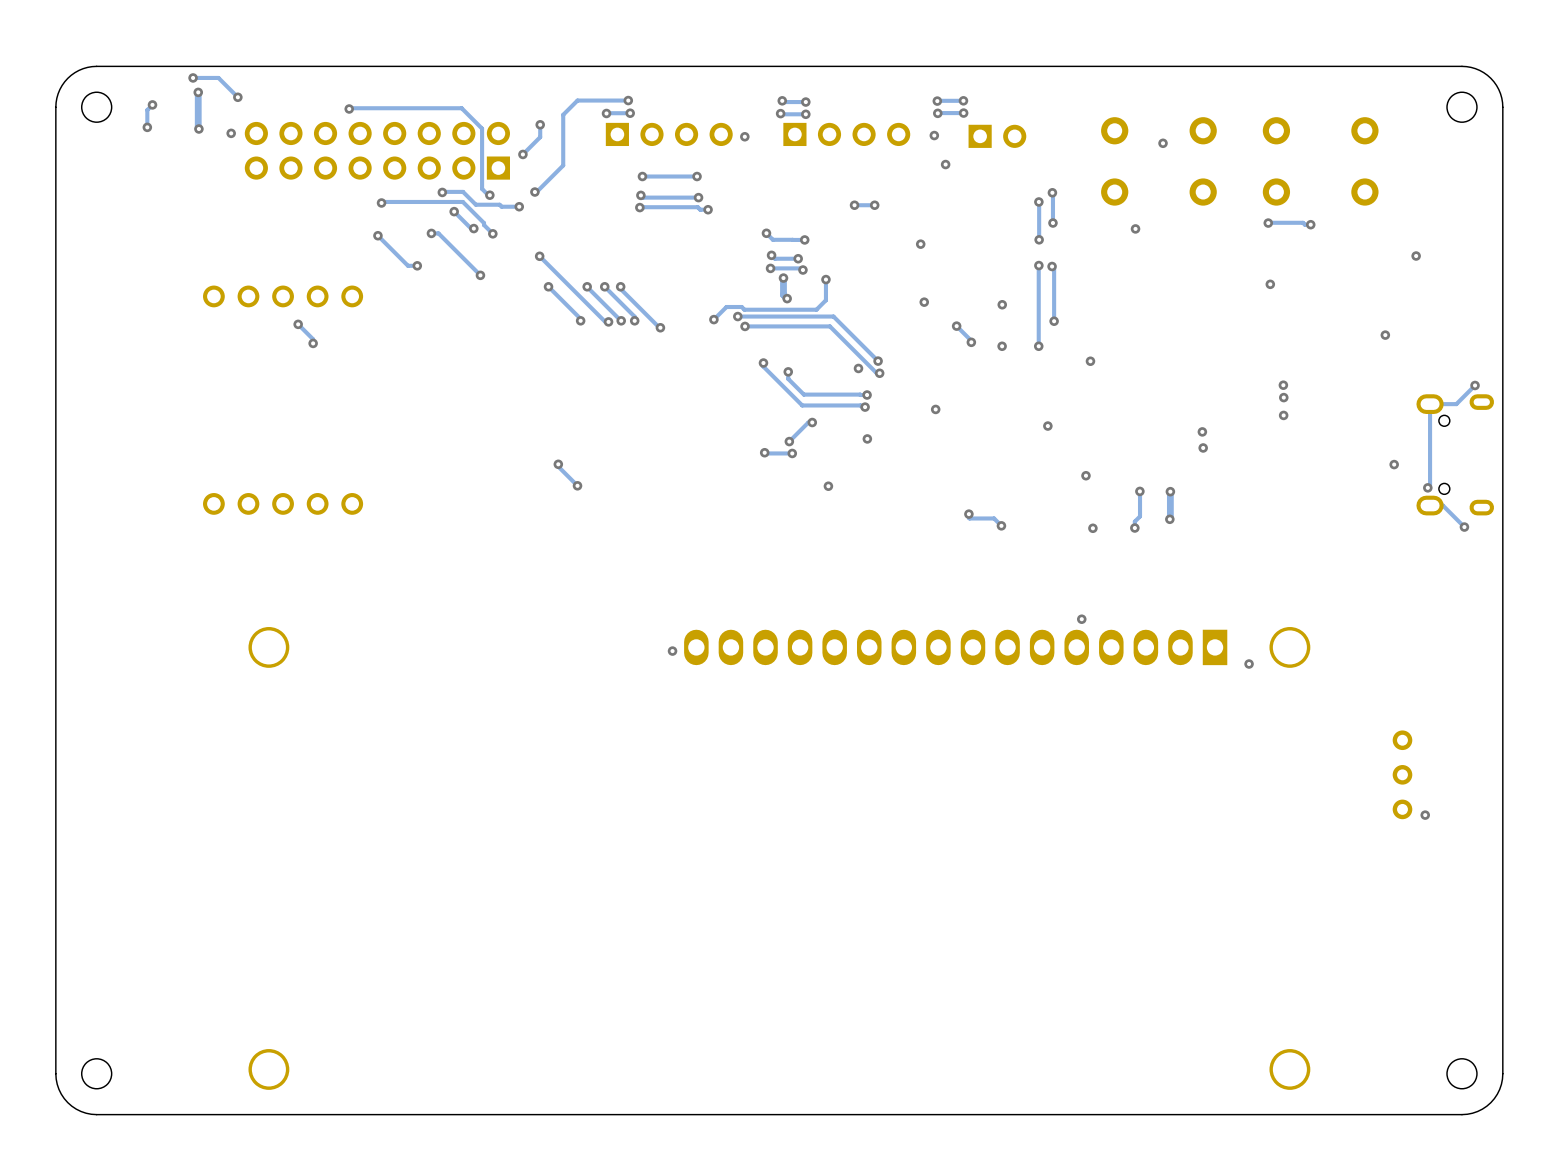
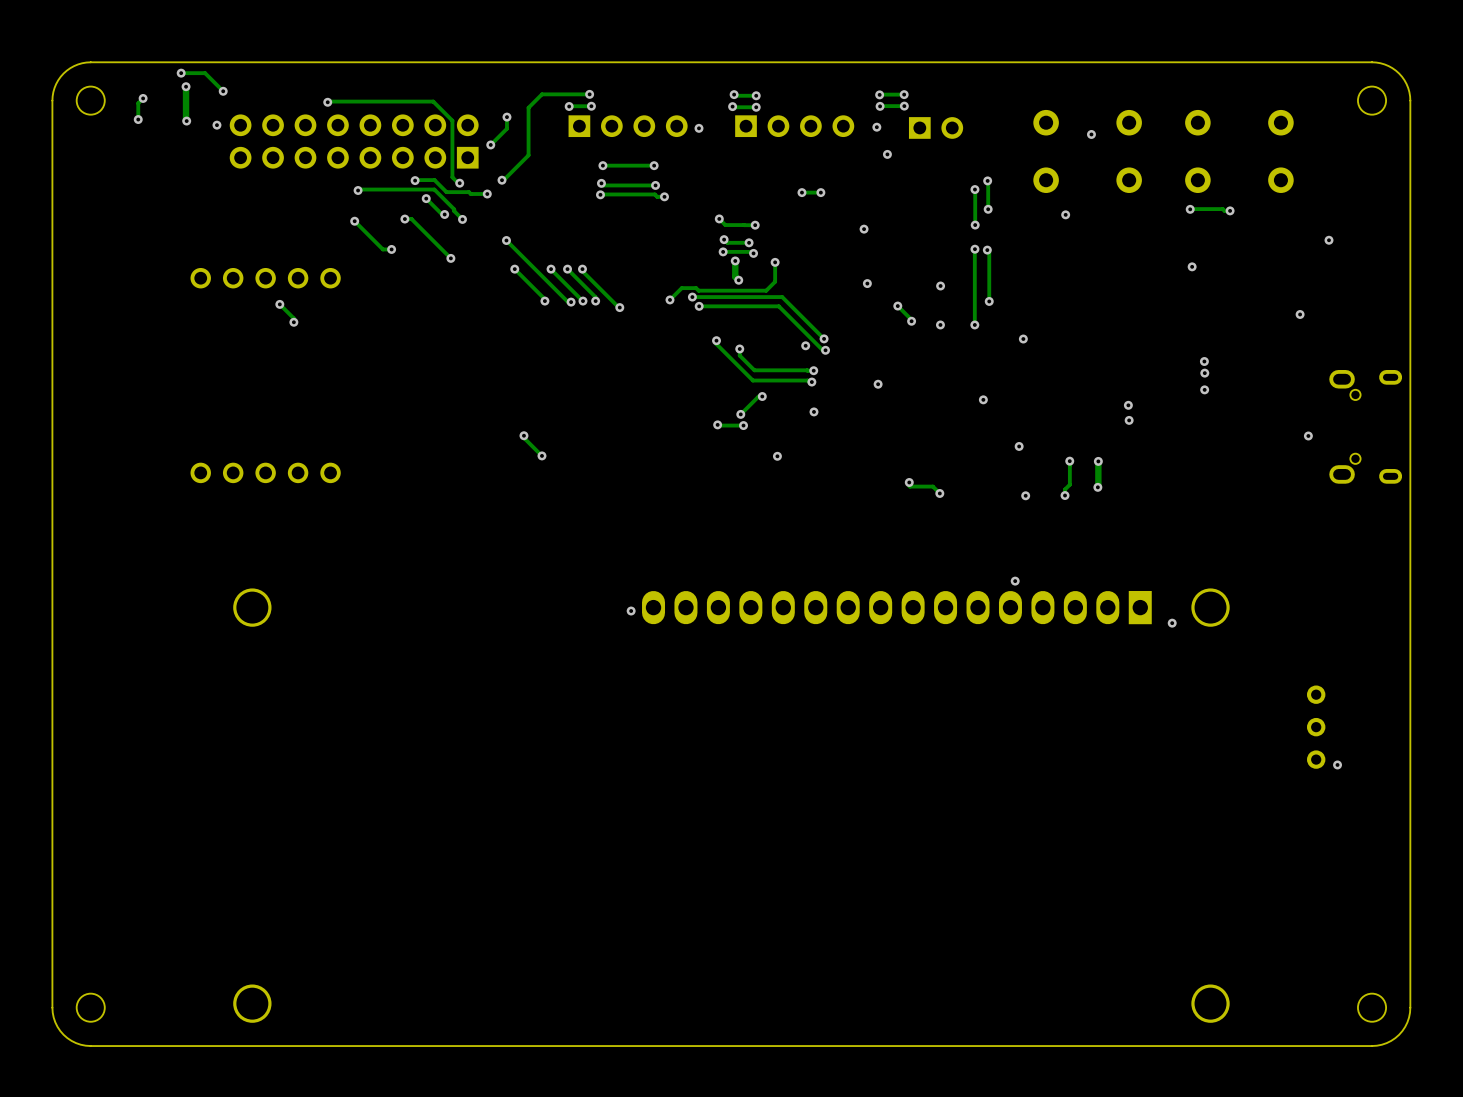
track: (1475, 385) (1456, 404) (1430, 404) (1430, 485) (1427, 487) -> none
via: (1475, 385) -> none
via: (1427, 487) -> none
track: (1430, 505) (1442, 505) (1464, 527) -> none
via: (1464, 527) -> none

